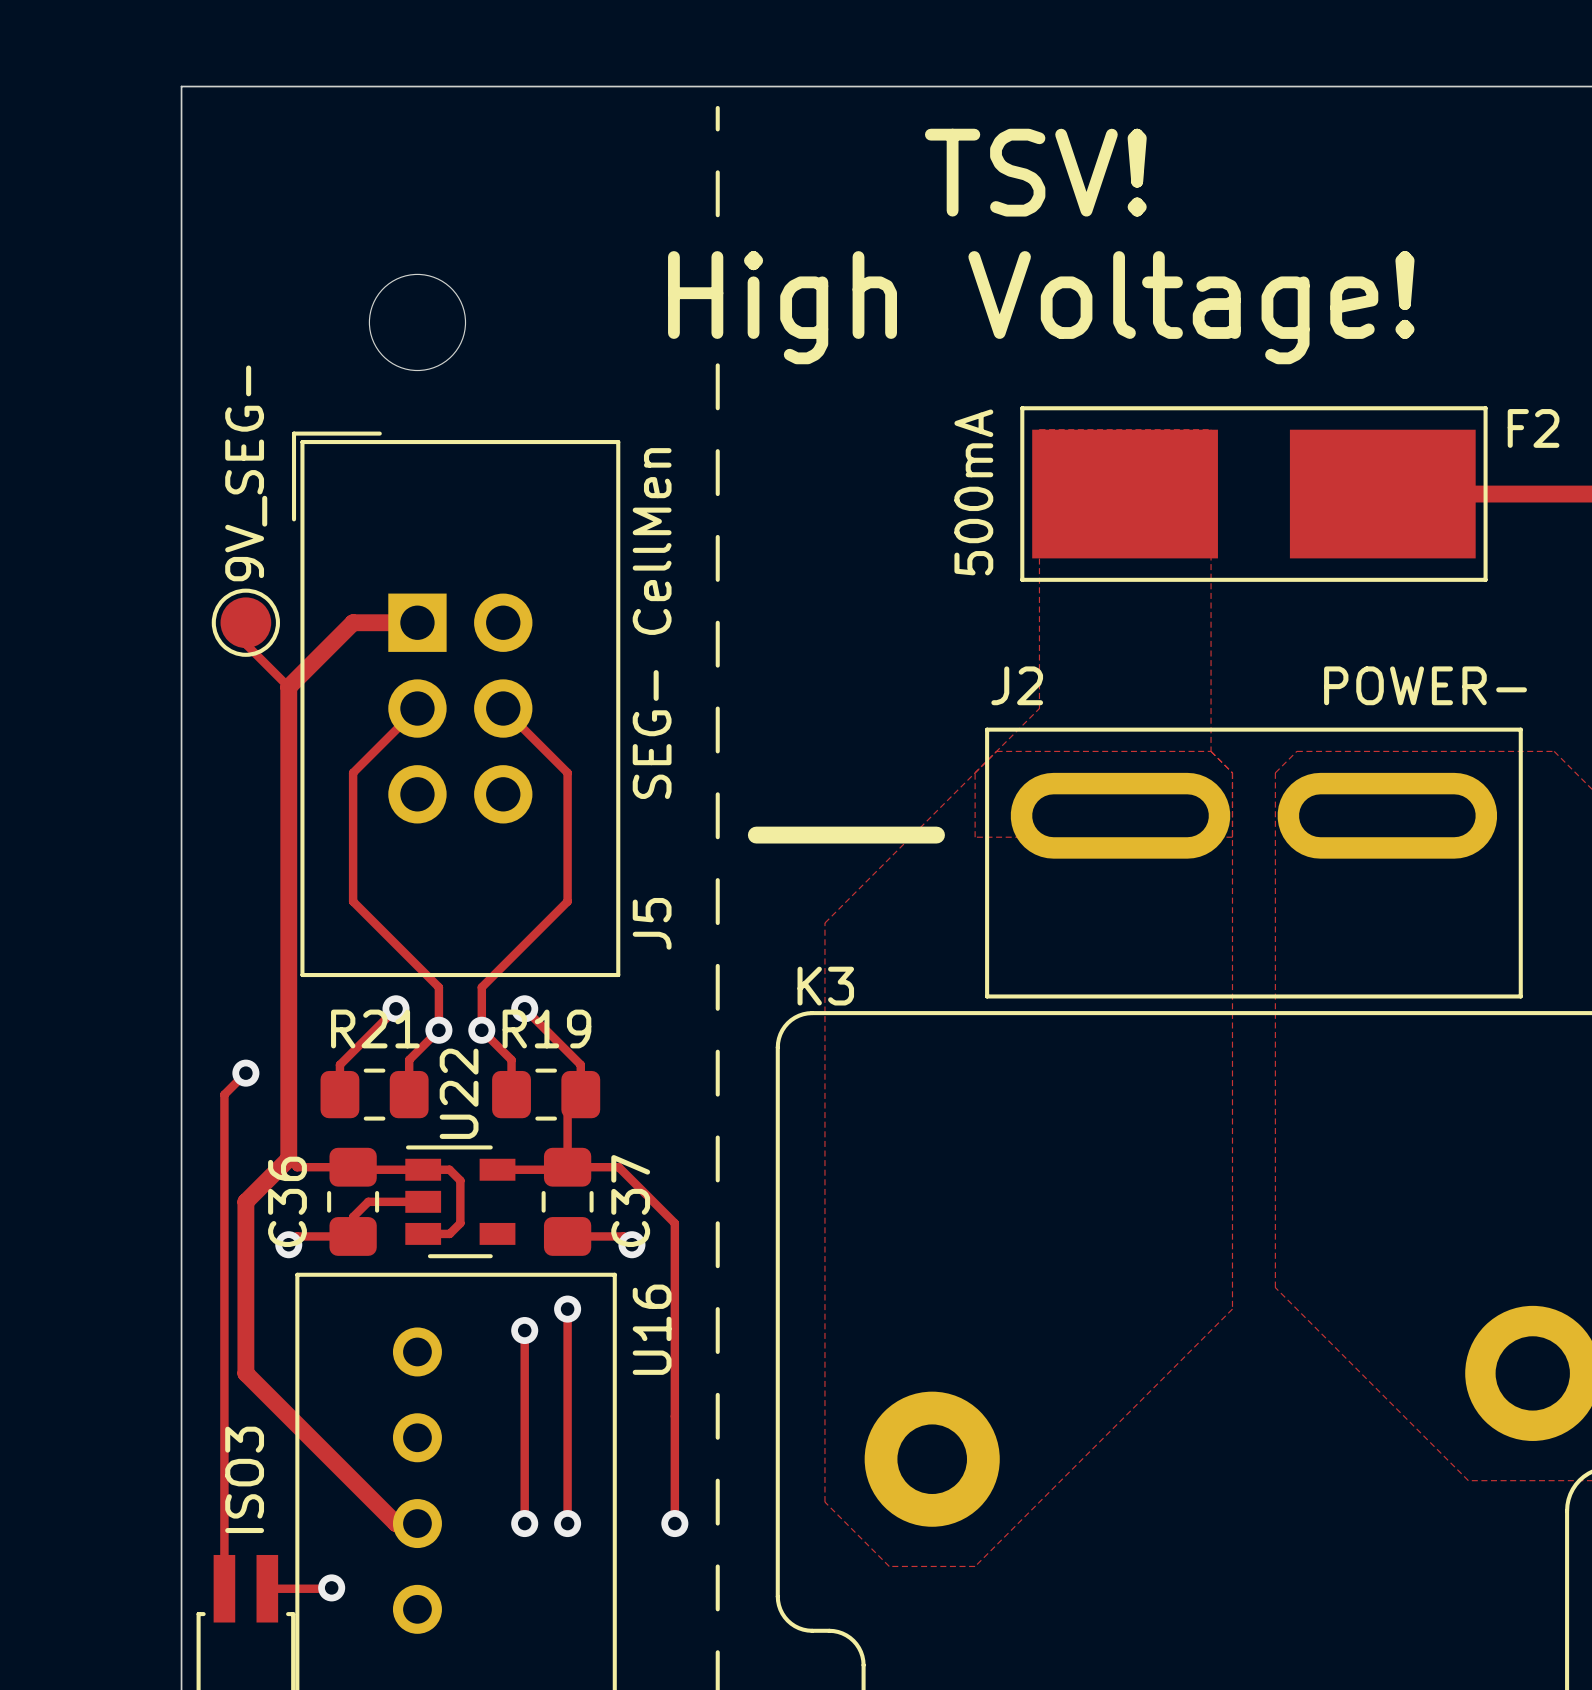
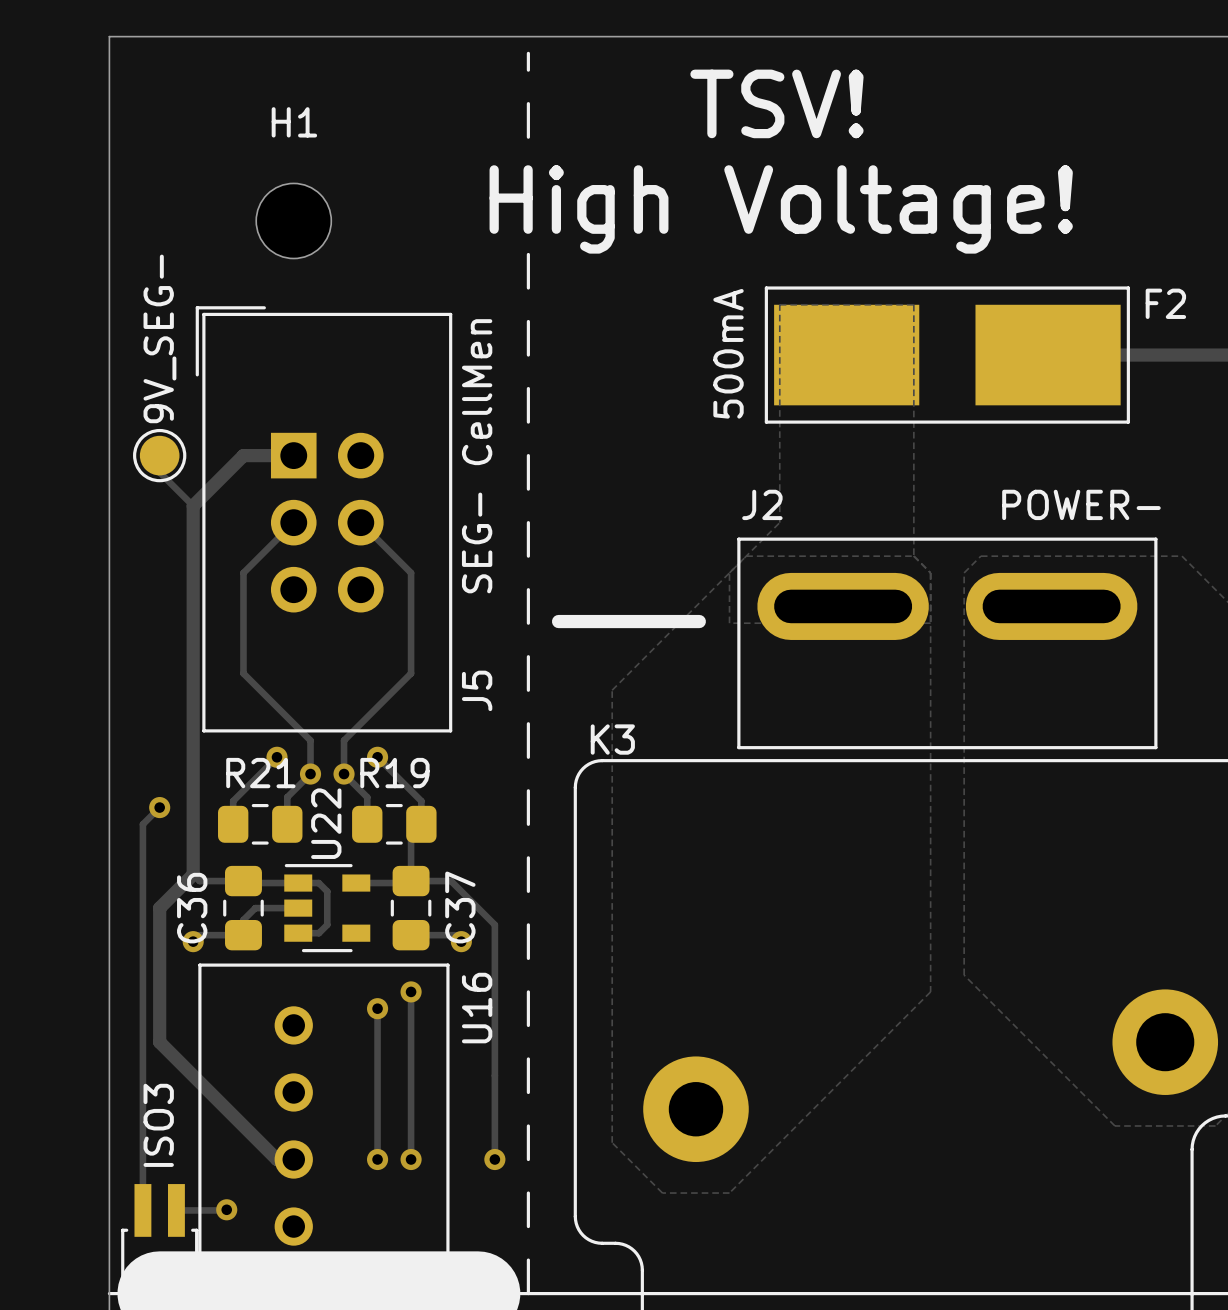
H1 name: none -> H1 (294, 122)

